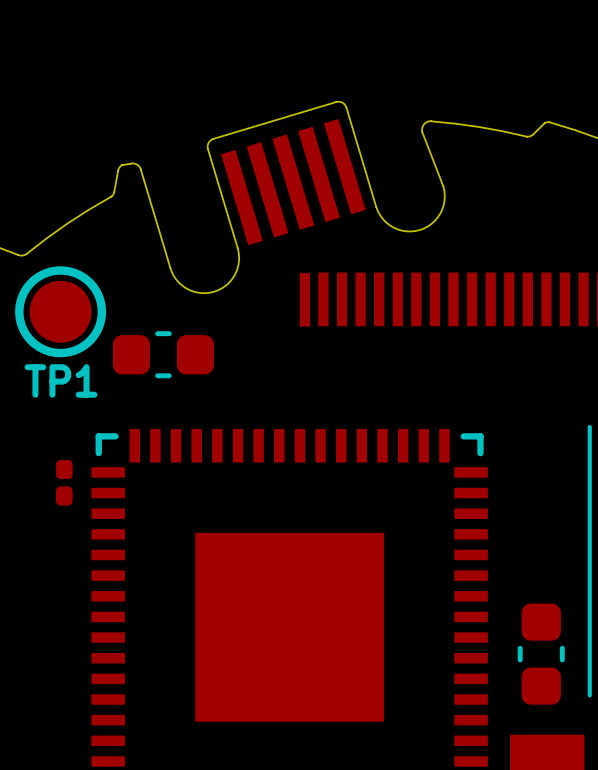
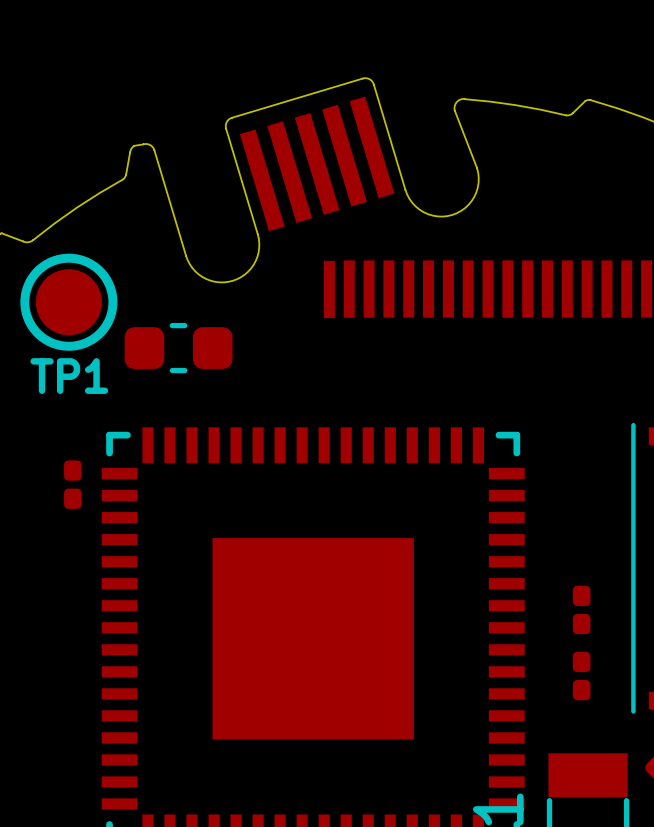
part: none -> (581, 609)
part footprint: [517, 603, 565, 705] -> [572, 651, 591, 701]

